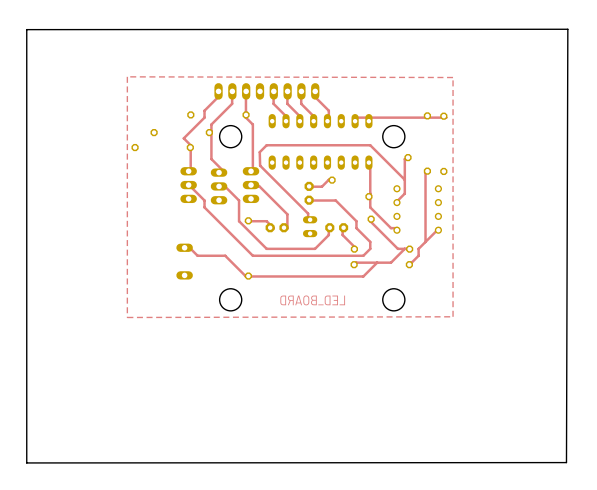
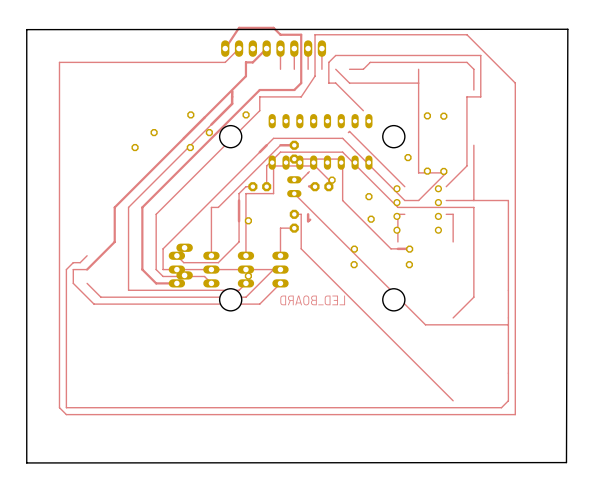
top track: none -> (225, 48) (239, 27) (273, 27) (280, 34) (301, 34) (301, 83) (294, 90) (259, 90) (142, 207) (142, 269) (156, 283) (176, 283)
top track: none -> (239, 48) (225, 62) (59, 62) (59, 407) (66, 414) (515, 414) (515, 83) (466, 34) (315, 34) (315, 76) (301, 96) (259, 96) (259, 110) (156, 214) (156, 269) (163, 276) (204, 276) (211, 283)
top track: none -> (280, 48) (280, 69)
top track: none -> (294, 48) (294, 69)
top track: none -> (308, 48) (308, 69)
top track: none -> (321, 48) (321, 69)
top track: none -> (335, 69) (349, 83) (418, 83)
top track: none -> (349, 69) (363, 69) (370, 62) (466, 62) (473, 69) (473, 90)
top track: none -> (418, 69) (418, 172) (446, 172) (418, 200) (404, 200) (342, 138) (273, 138) (266, 145)
top zone outline: (127, 76) (453, 77) (453, 316) (127, 317) (127, 76) -> none
top track: (218, 91) (218, 96) (204, 110) (204, 117) -> (266, 48) (252, 62) (245, 62) (245, 76) (204, 117)
top track: (246, 91) (245, 117) -> none
part position: (266, 91) -> (273, 48)
top track: (273, 91) (273, 103) (287, 117) (286, 121) -> none
top track: (287, 91) (287, 103) (301, 117) (299, 121) -> none
top track: (301, 91) (301, 103) (315, 117) (313, 121) -> none
top track: (315, 91) (315, 96) (328, 110) (327, 121) -> none
top track: none -> (363, 110) (335, 83) (328, 83) (328, 62) (335, 55) (480, 55) (480, 96) (466, 96) (466, 165) (446, 186)
top track: (443, 116) (446, 117) (356, 117) (355, 121) -> none
top track: (245, 117) (252, 124) (252, 172) (251, 171) -> none
top track: (211, 124) (211, 159) (225, 172) (219, 172) -> (211, 124) (128, 207) (128, 290) (239, 290) (245, 283)
top track: none -> (348, 132) (349, 131) (404, 186)
top track: (183, 138) (190, 145) (190, 172) (188, 171) -> (183, 138) (114, 207) (114, 241) (87, 269) (73, 269) (73, 283) (94, 304) (259, 304) (280, 283)
top track: (280, 145) (266, 145) -> (280, 145) (218, 207) (211, 207) (211, 255)
top track: (294, 145) (370, 145) (404, 179) -> none
top track: none -> (473, 145) (473, 200)
top track: (259, 152) (260, 165) (308, 214) -> (259, 152) (163, 248) (163, 269) (280, 269)
part: none -> (294, 152)
top track: (408, 157) (404, 159) (404, 193) (396, 202) -> none
top track: (368, 162) (370, 207) (390, 228) (397, 228) (396, 230) -> none
top track: none -> (309, 171) (301, 179) (294, 179)
top track: (427, 171) (425, 172) (425, 241) -> none
top track: (332, 180) (328, 179) (321, 186) (315, 186) -> none
top track: (188, 185) (204, 200) (204, 207) (252, 255) (363, 255) (370, 248) (370, 241) (356, 228) (356, 221) (335, 200) (309, 200) -> none
part: (188, 185) -> none
top track: (251, 185) (259, 186) (287, 214) (287, 228) (283, 227) -> none
part: (251, 185) -> none
top track: (219, 186) (225, 186) (239, 200) -> (252, 186) (245, 186) (239, 193) (239, 200)
part: (219, 186) -> none
part: none -> (259, 186)
top track: none -> (266, 186) (266, 165) (280, 152) (342, 152) (397, 207) (473, 207) (473, 297) (453, 317)
top track: none -> (328, 186) (328, 179) (315, 165) (273, 165) (273, 193) (245, 193) (245, 255)
top track: none -> (294, 193) (425, 324) (508, 324)
part rotation: 0° (309, 193) -> 90° clockwise (321, 186)
part position: (309, 193) -> (321, 186)
top track: none -> (446, 200) (508, 200) (508, 400) (501, 407) (66, 407) (66, 269) (73, 262) (80, 262) (87, 255)
top track: none -> (294, 214) (301, 214) (301, 248) (453, 400)
top track: none -> (404, 214) (397, 214) (397, 241)
top track: none -> (446, 214) (453, 214) (453, 241)
top track: (371, 219) (370, 221) (397, 248) -> (294, 159) (342, 159) (342, 200) (390, 248) (397, 248)
top track: (248, 220) (245, 221) (266, 221) (273, 228) (270, 227) -> none
top track: (239, 221) (266, 248) (315, 248) (328, 235) (329, 227) -> (239, 221) (239, 241) (218, 262) (183, 262) (176, 255)
part: none -> (294, 221)
part position: (310, 226) -> (294, 186)
part: (277, 227) -> none
part: (336, 227) -> none
top track: (343, 227) (342, 235) (356, 248) (354, 249) -> none
top track: none -> (294, 228) (280, 228) (280, 255)
top track: (438, 230) (439, 228) (418, 248) (418, 255) (409, 264) -> none
top track: (184, 247) (190, 248) (197, 255) (225, 255) (245, 276) -> none
top track: (404, 248) (390, 262) (356, 262) (354, 264) -> none
top track: (377, 262) (363, 276) (245, 276) -> none
part: none -> (176, 269)
part: none -> (211, 269)
part: none -> (245, 269)
top track: none -> (273, 269) (245, 297) (100, 297) (87, 283)
part: none -> (280, 269)

